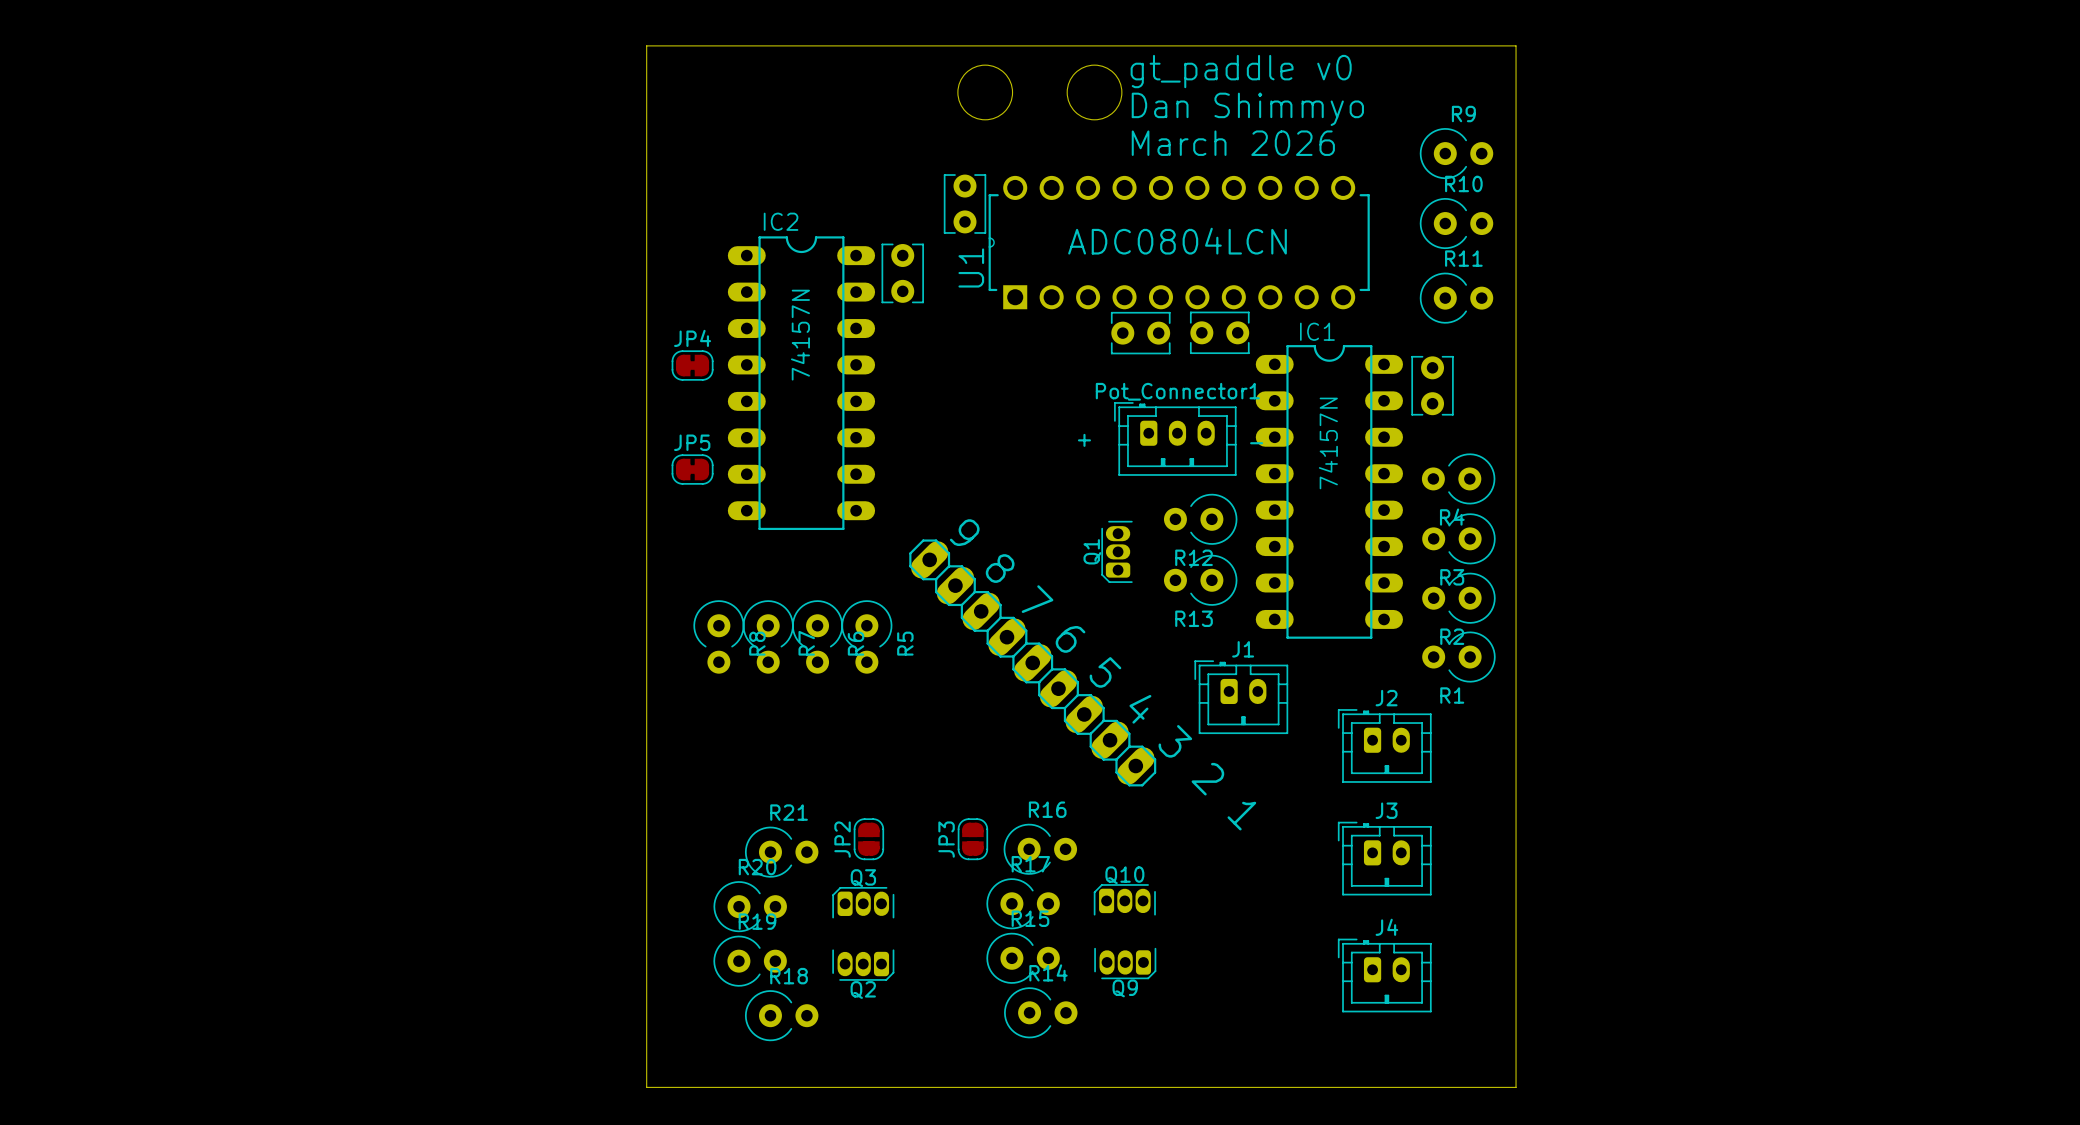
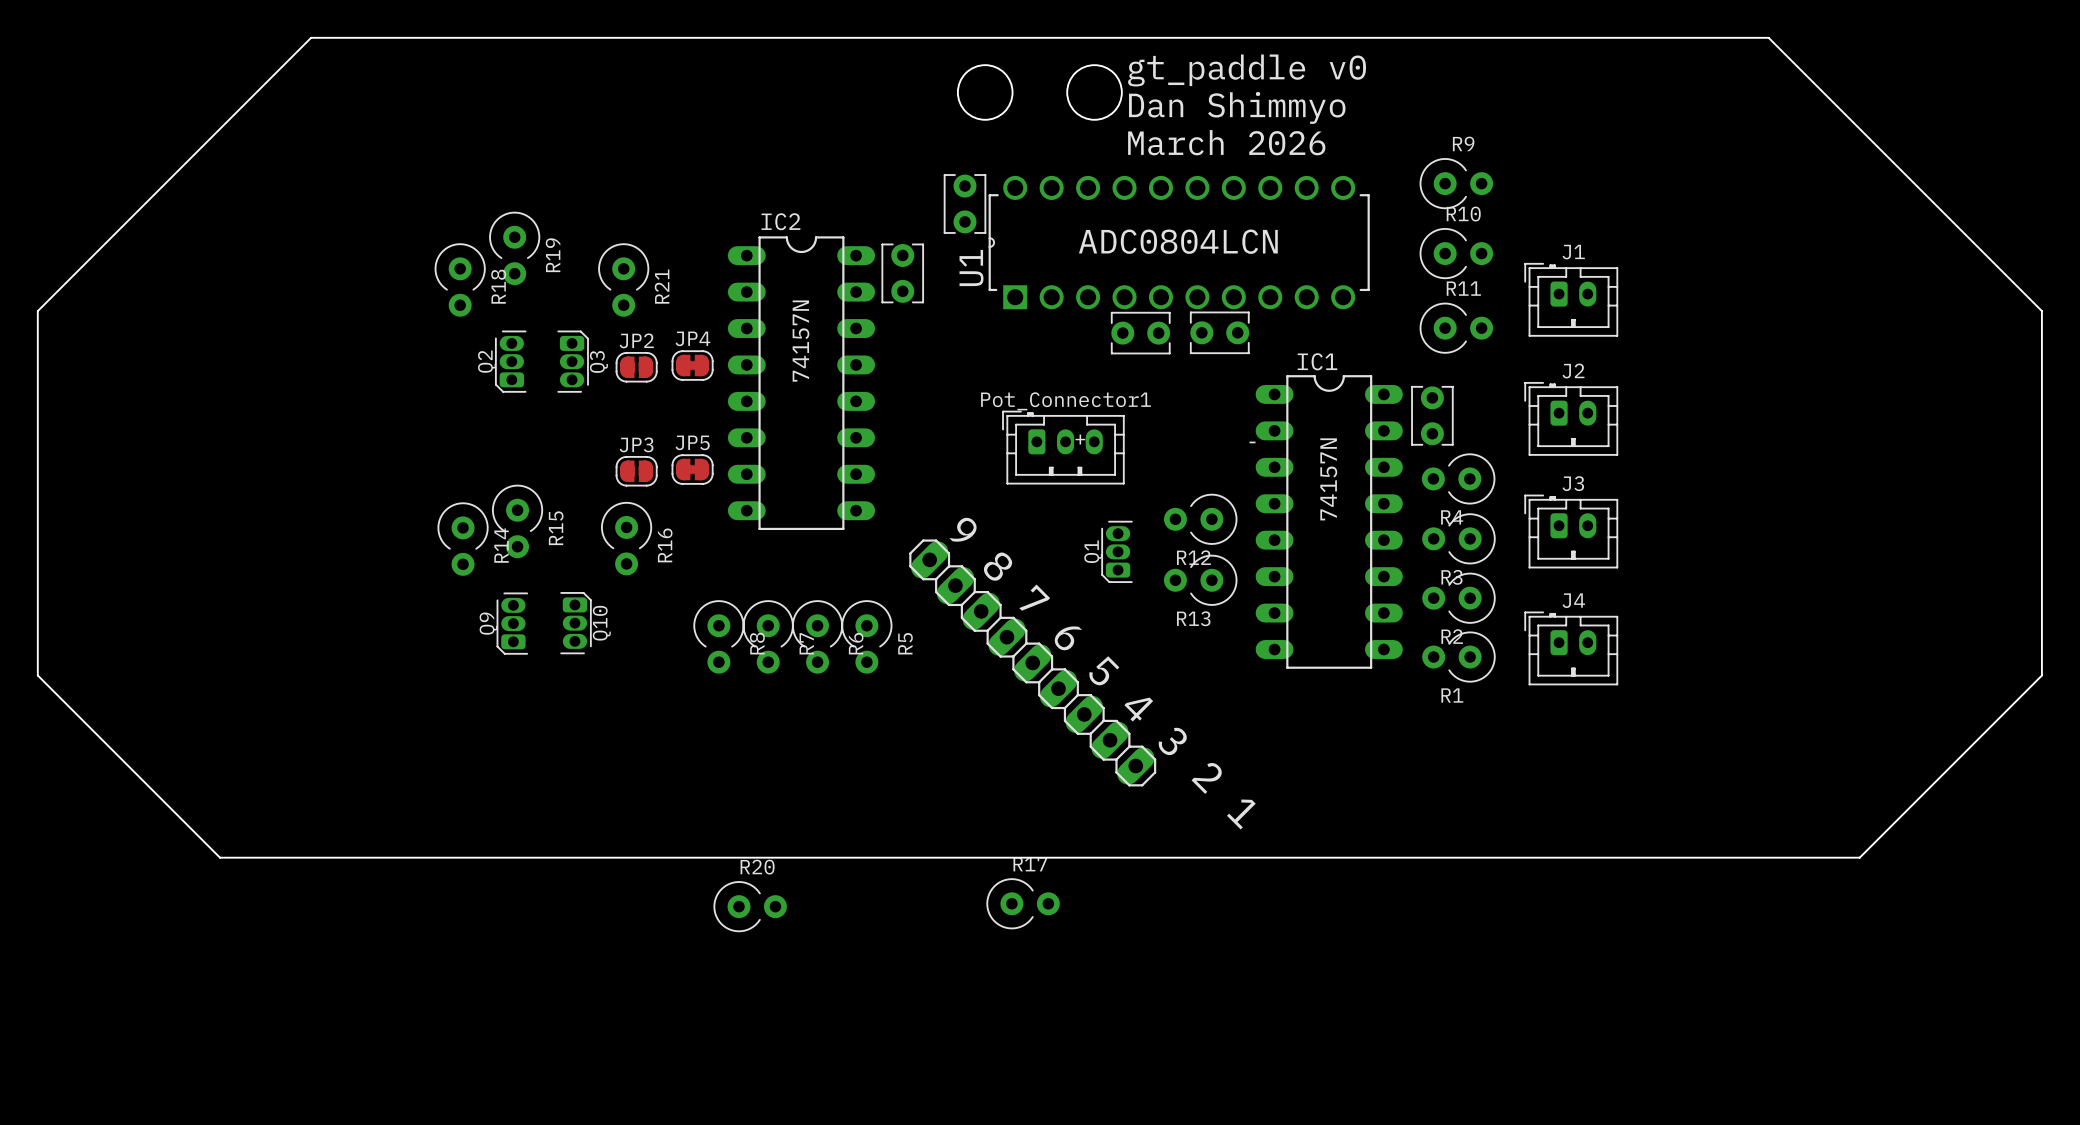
board edge: none -> (311, 37) (37, 311) (37, 675) (220, 857) (1859, 857) (2041, 675) (2041, 311) (1768, 37) (311, 37)
board edge: (646, 45) (1516, 45) (1516, 1087) (646, 1087) (646, 45) -> none
R9 position: (1456, 153) -> (1456, 183)
R10 position: (1456, 223) -> (1456, 253)
R11 position: (1456, 298) -> (1456, 328)
part position: (1432, 385) -> (1432, 415)
Pot_Connector1 position: (1175, 438) -> (1063, 447)
IC1 position: (1329, 491) -> (1329, 521)
J1 position: (1241, 697) -> (1571, 299)
J2 position: (1384, 745) -> (1571, 418)
JP2 rotation: 0° (868, 839) -> 90° clockwise (636, 367)
JP2 position: (868, 839) -> (636, 367)
JP3 rotation: 0° (972, 839) -> 90° clockwise (636, 471)
JP3 position: (972, 839) -> (636, 471)
R16 rotation: 0° (1040, 849) -> 90° clockwise (626, 538)
R16 position: (1040, 849) -> (626, 538)
R21 rotation: 0° (781, 852) -> 90° clockwise (623, 280)
R21 position: (781, 852) -> (623, 280)
J3 position: (1384, 858) -> (1571, 531)
Q10 rotation: 0° (1124, 899) -> 90° clockwise (576, 623)
Q10 position: (1124, 899) -> (576, 623)
Q3 rotation: 0° (863, 902) -> 90° clockwise (573, 361)
Q3 position: (863, 902) -> (573, 361)
R15 rotation: 0° (1023, 958) -> 90° clockwise (517, 521)
R15 position: (1023, 958) -> (517, 521)
R19 rotation: 0° (750, 961) -> 90° clockwise (514, 248)
R19 position: (750, 961) -> (514, 248)
Q9 rotation: 0° (1125, 963) -> 90° clockwise (512, 623)
Q9 position: (1125, 963) -> (512, 623)
Q2 rotation: 0° (863, 965) -> 90° clockwise (510, 361)
Q2 position: (863, 965) -> (510, 361)
J4 position: (1384, 975) -> (1571, 648)
R14 rotation: 0° (1040, 1012) -> 90° clockwise (463, 539)
R14 position: (1040, 1012) -> (463, 539)
R18 rotation: 0° (781, 1015) -> 90° clockwise (460, 280)
R18 position: (781, 1015) -> (460, 280)

